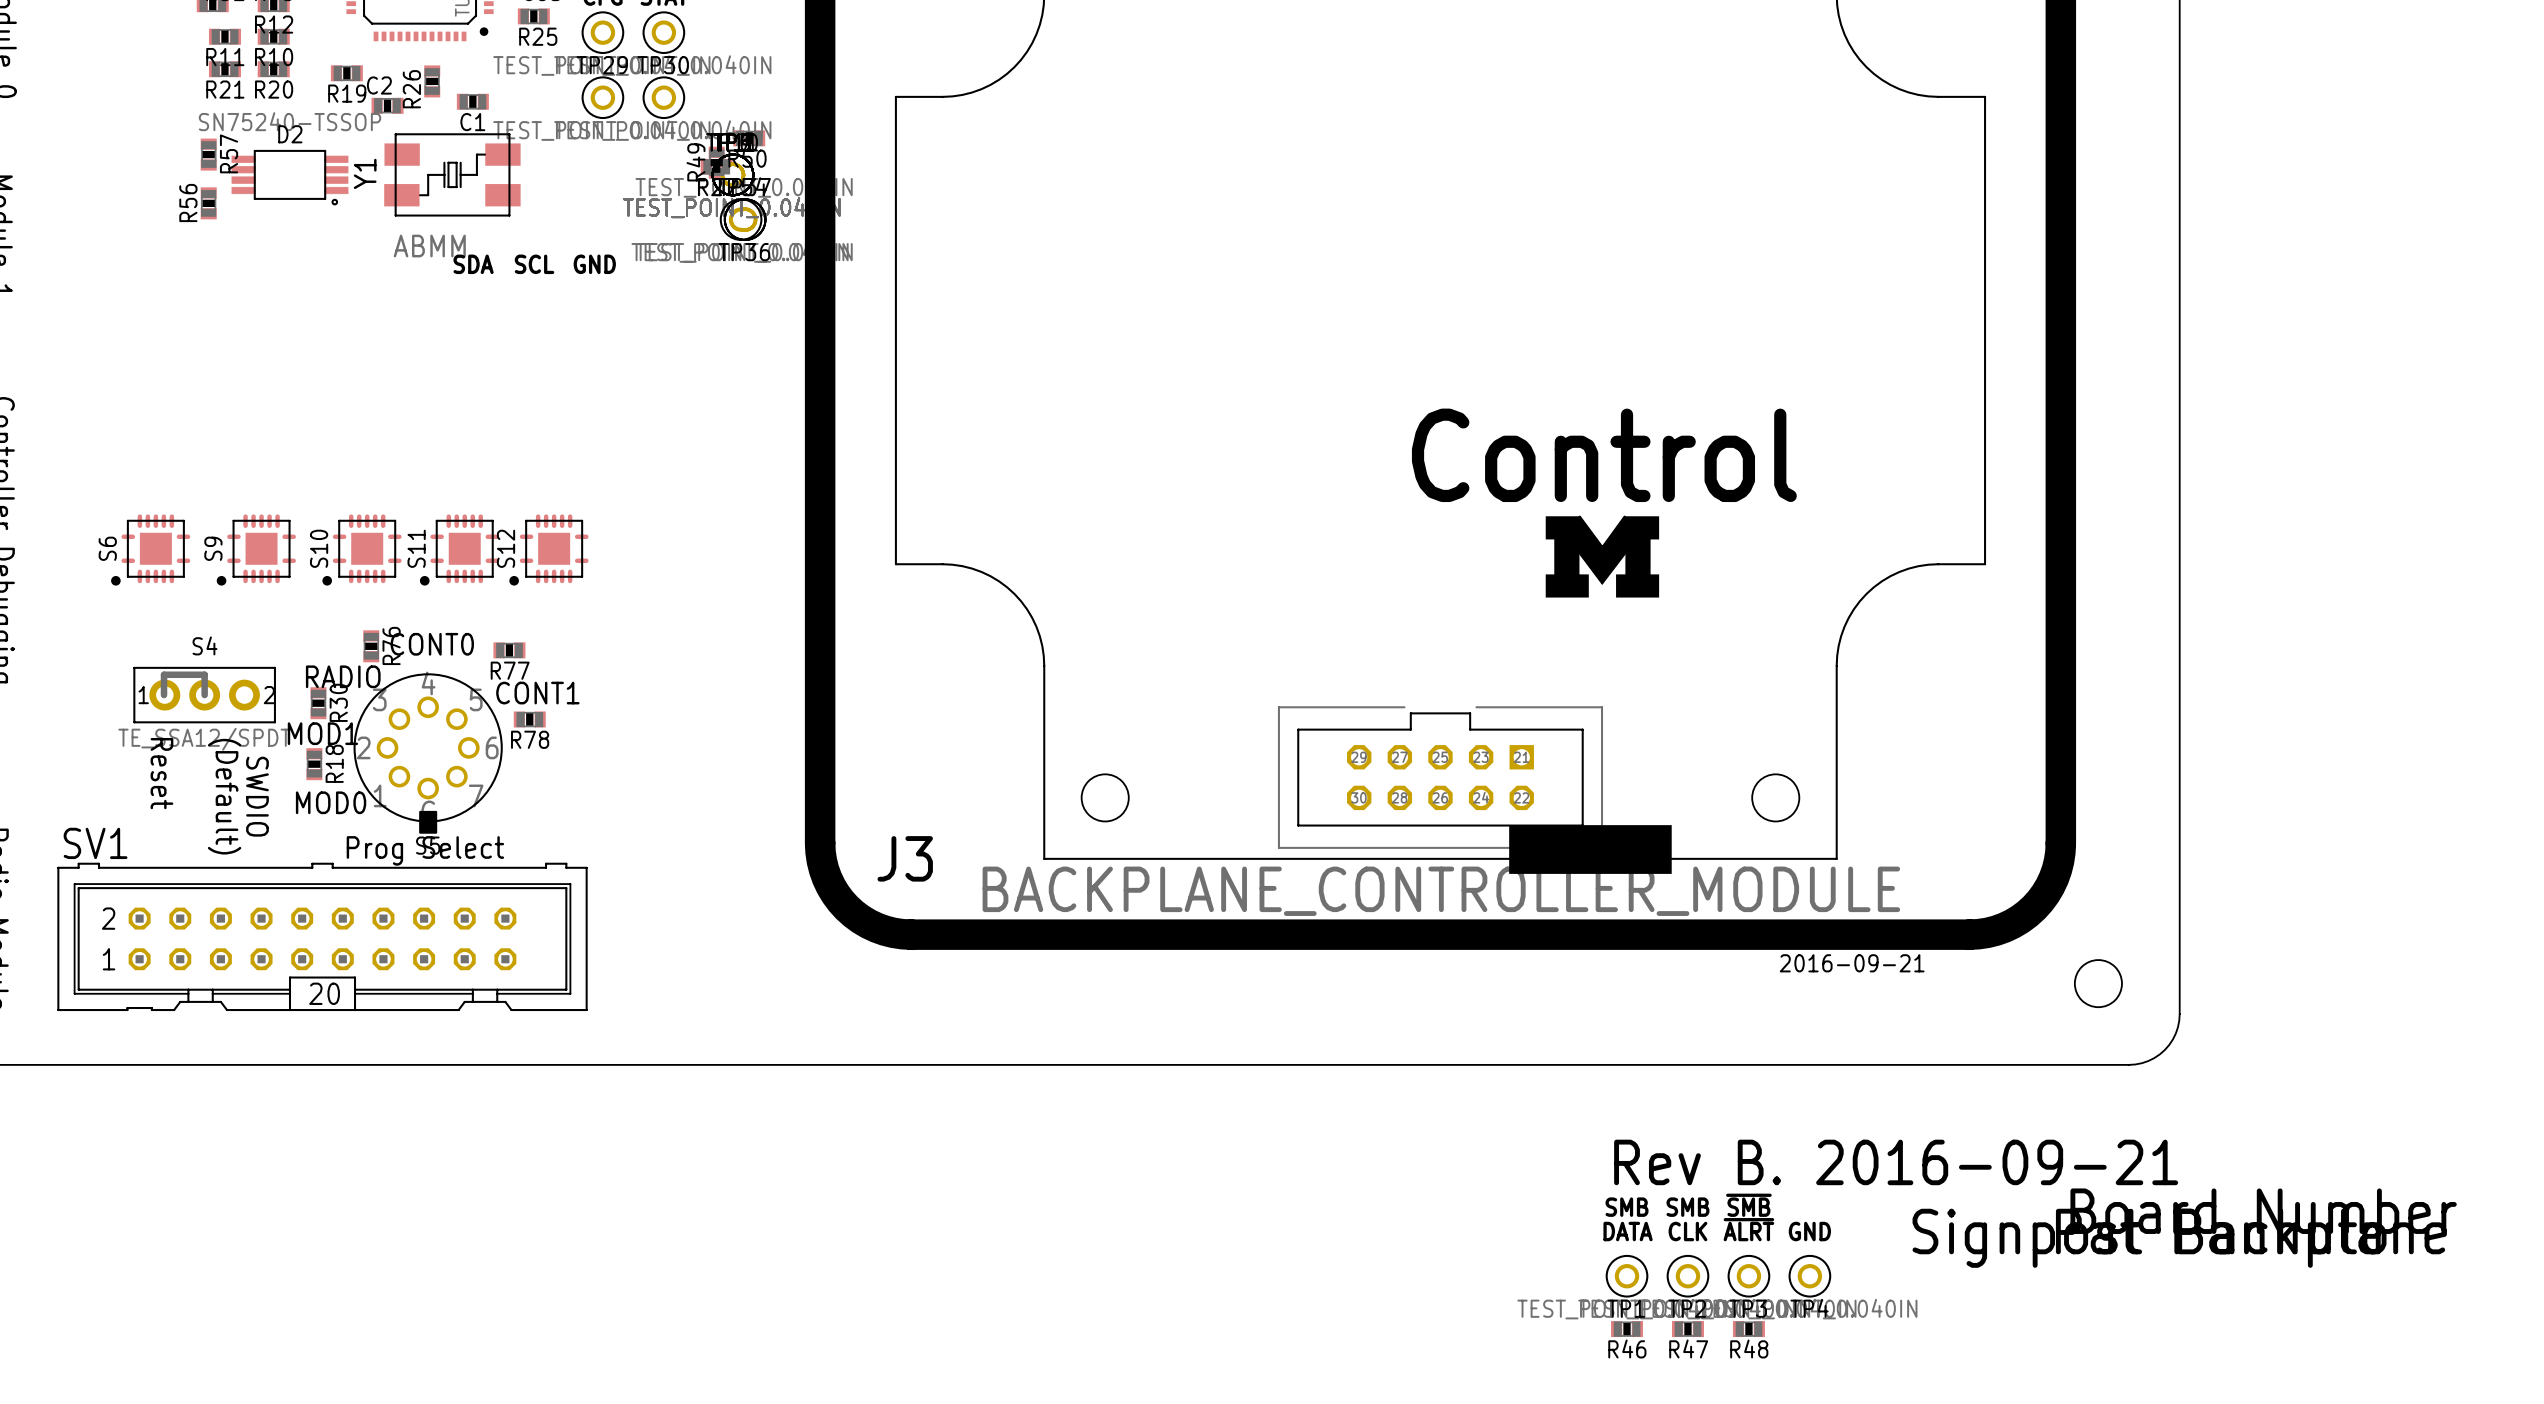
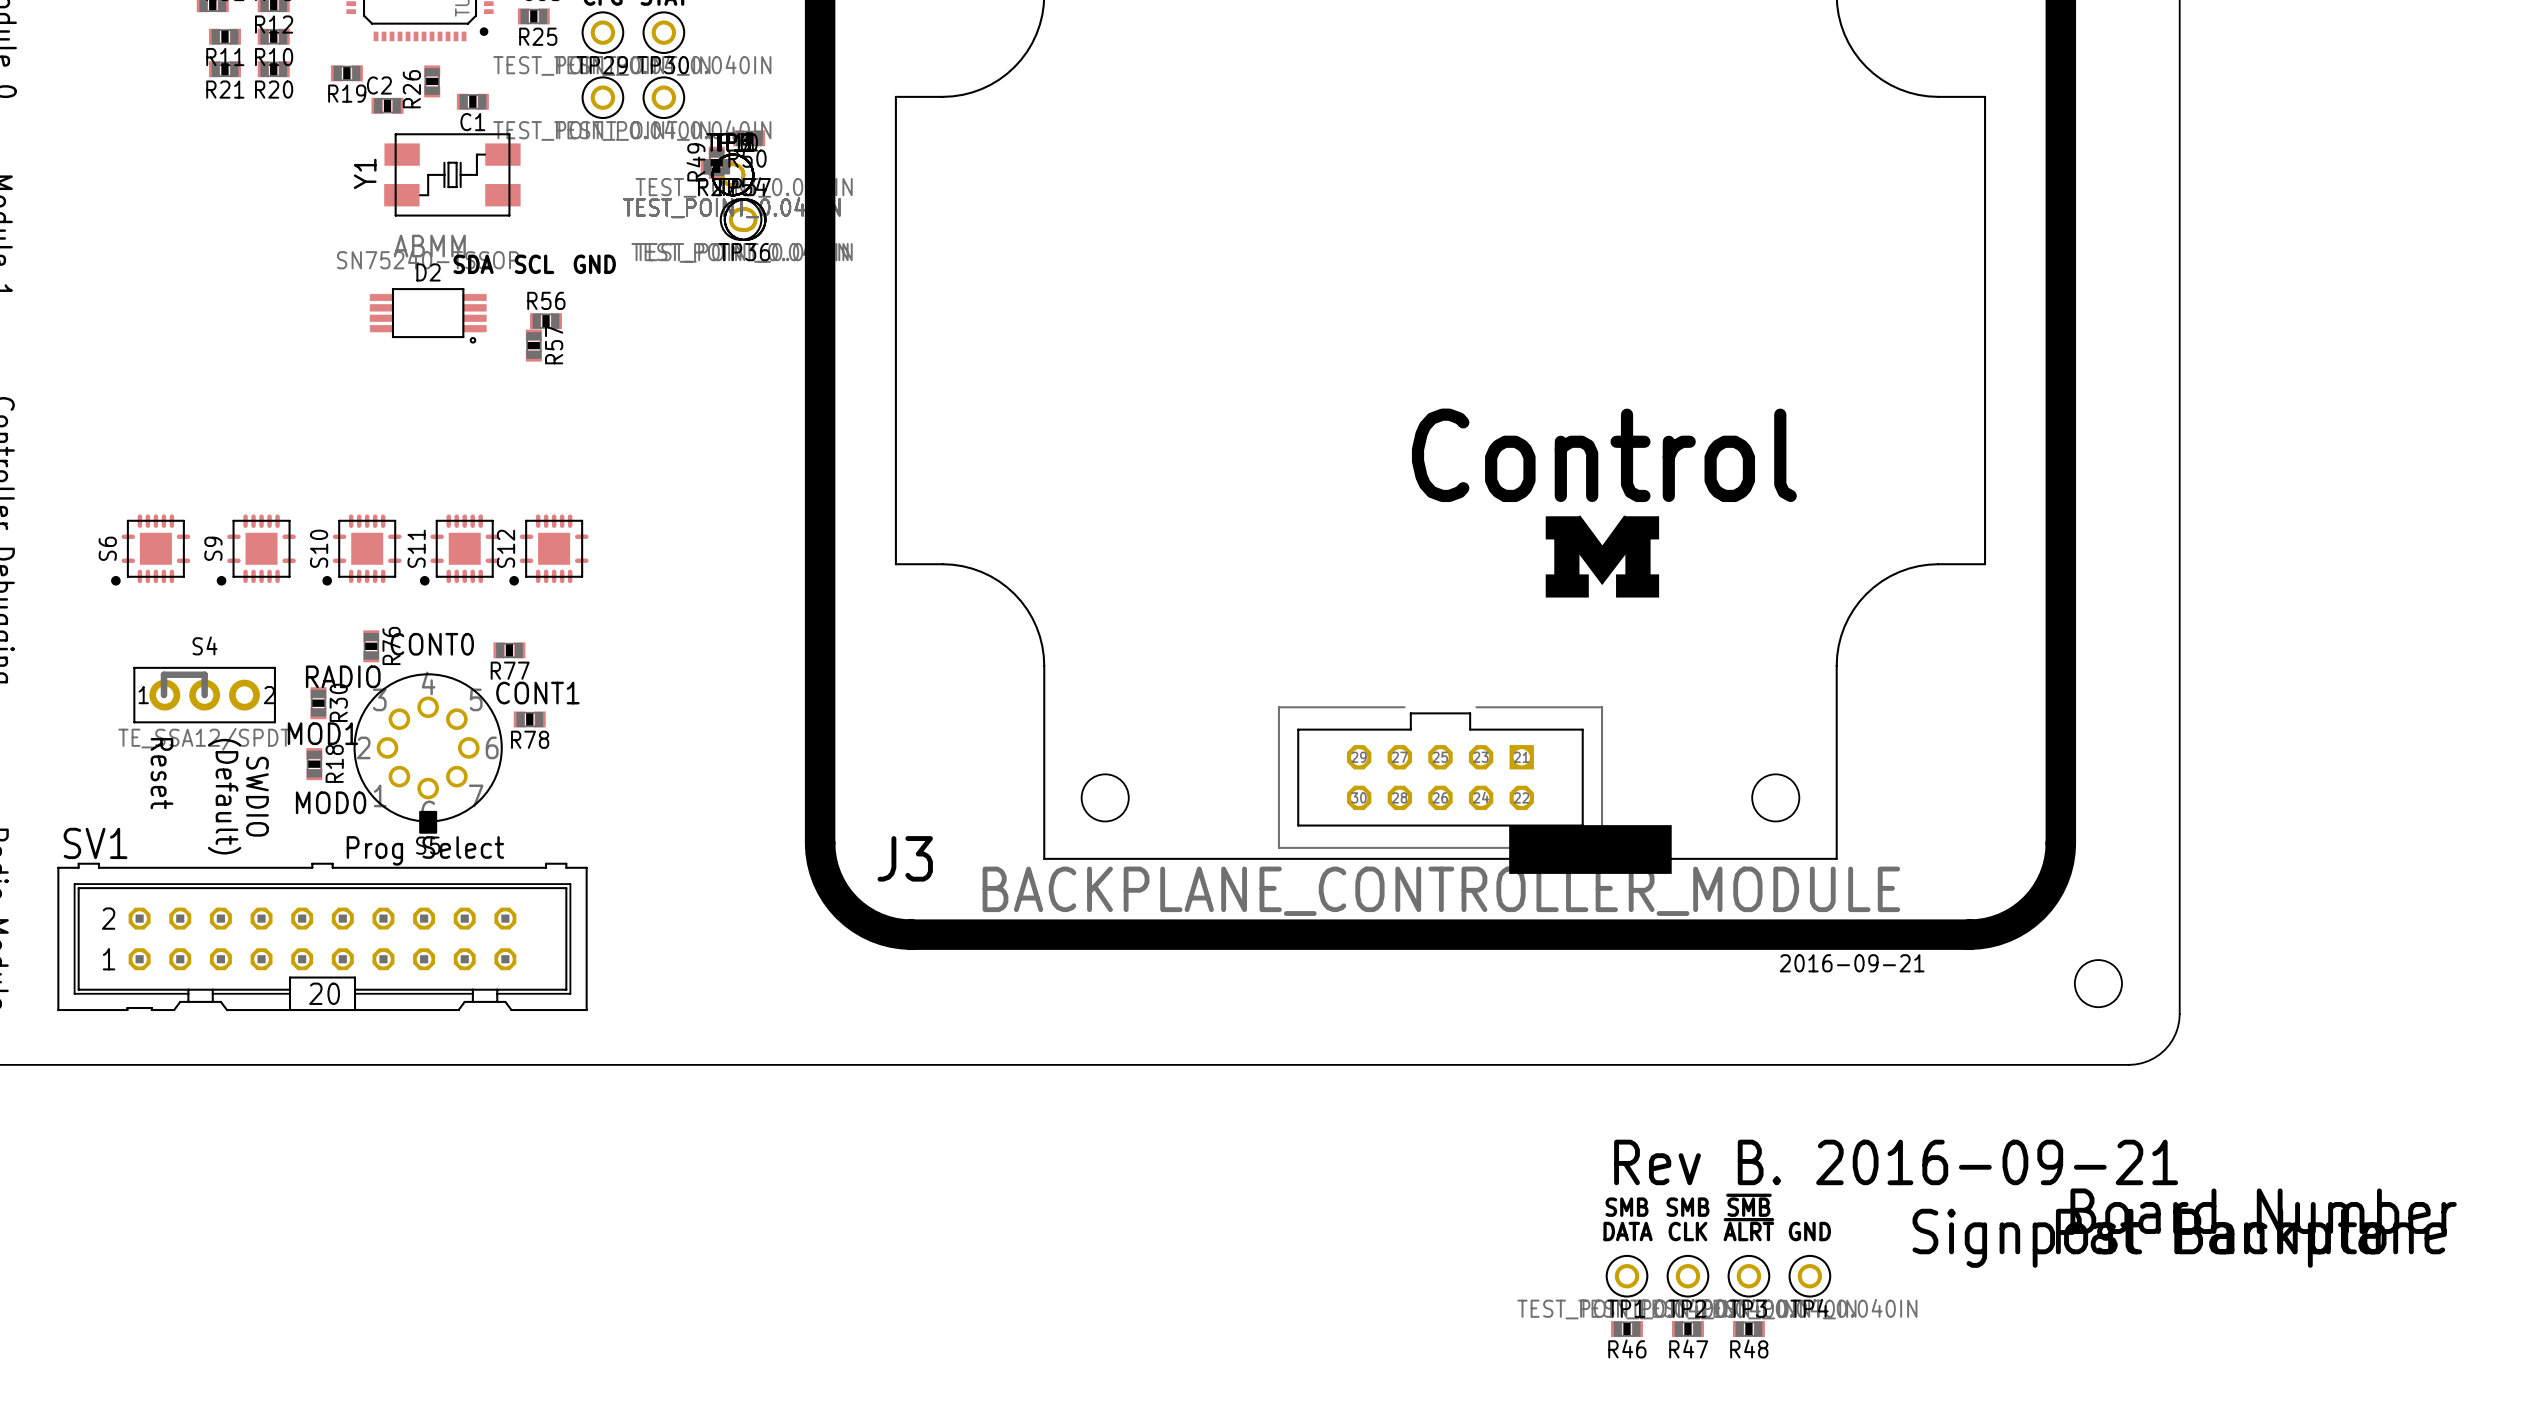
R57 position: (208, 154) -> (533, 345)
D2 position: (289, 177) -> (428, 315)
R56 rotation: 0° (208, 203) -> 90° clockwise (546, 321)
R56 position: (208, 203) -> (546, 321)

